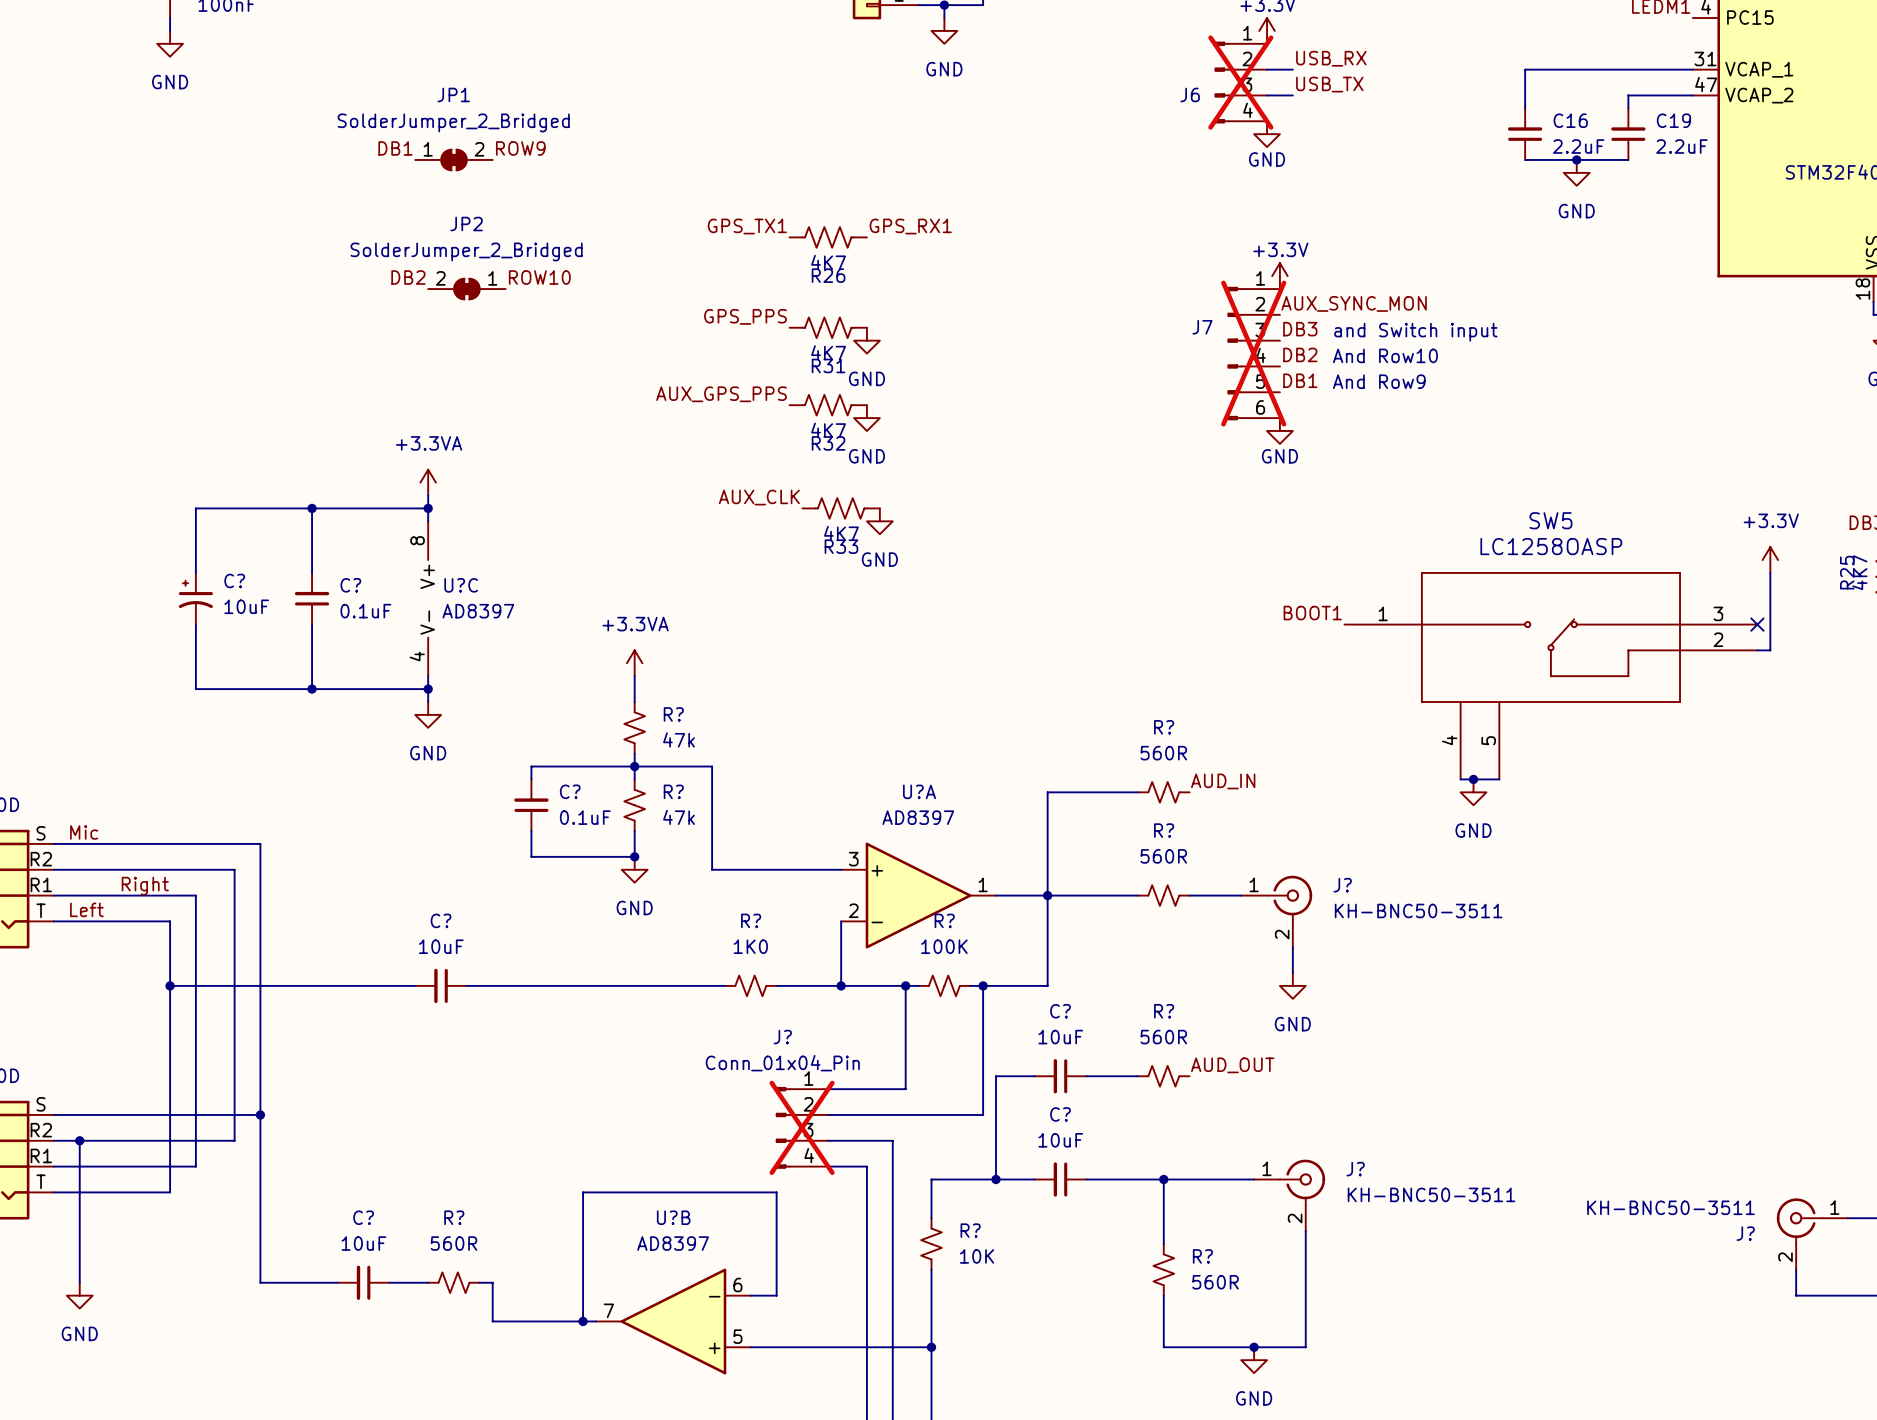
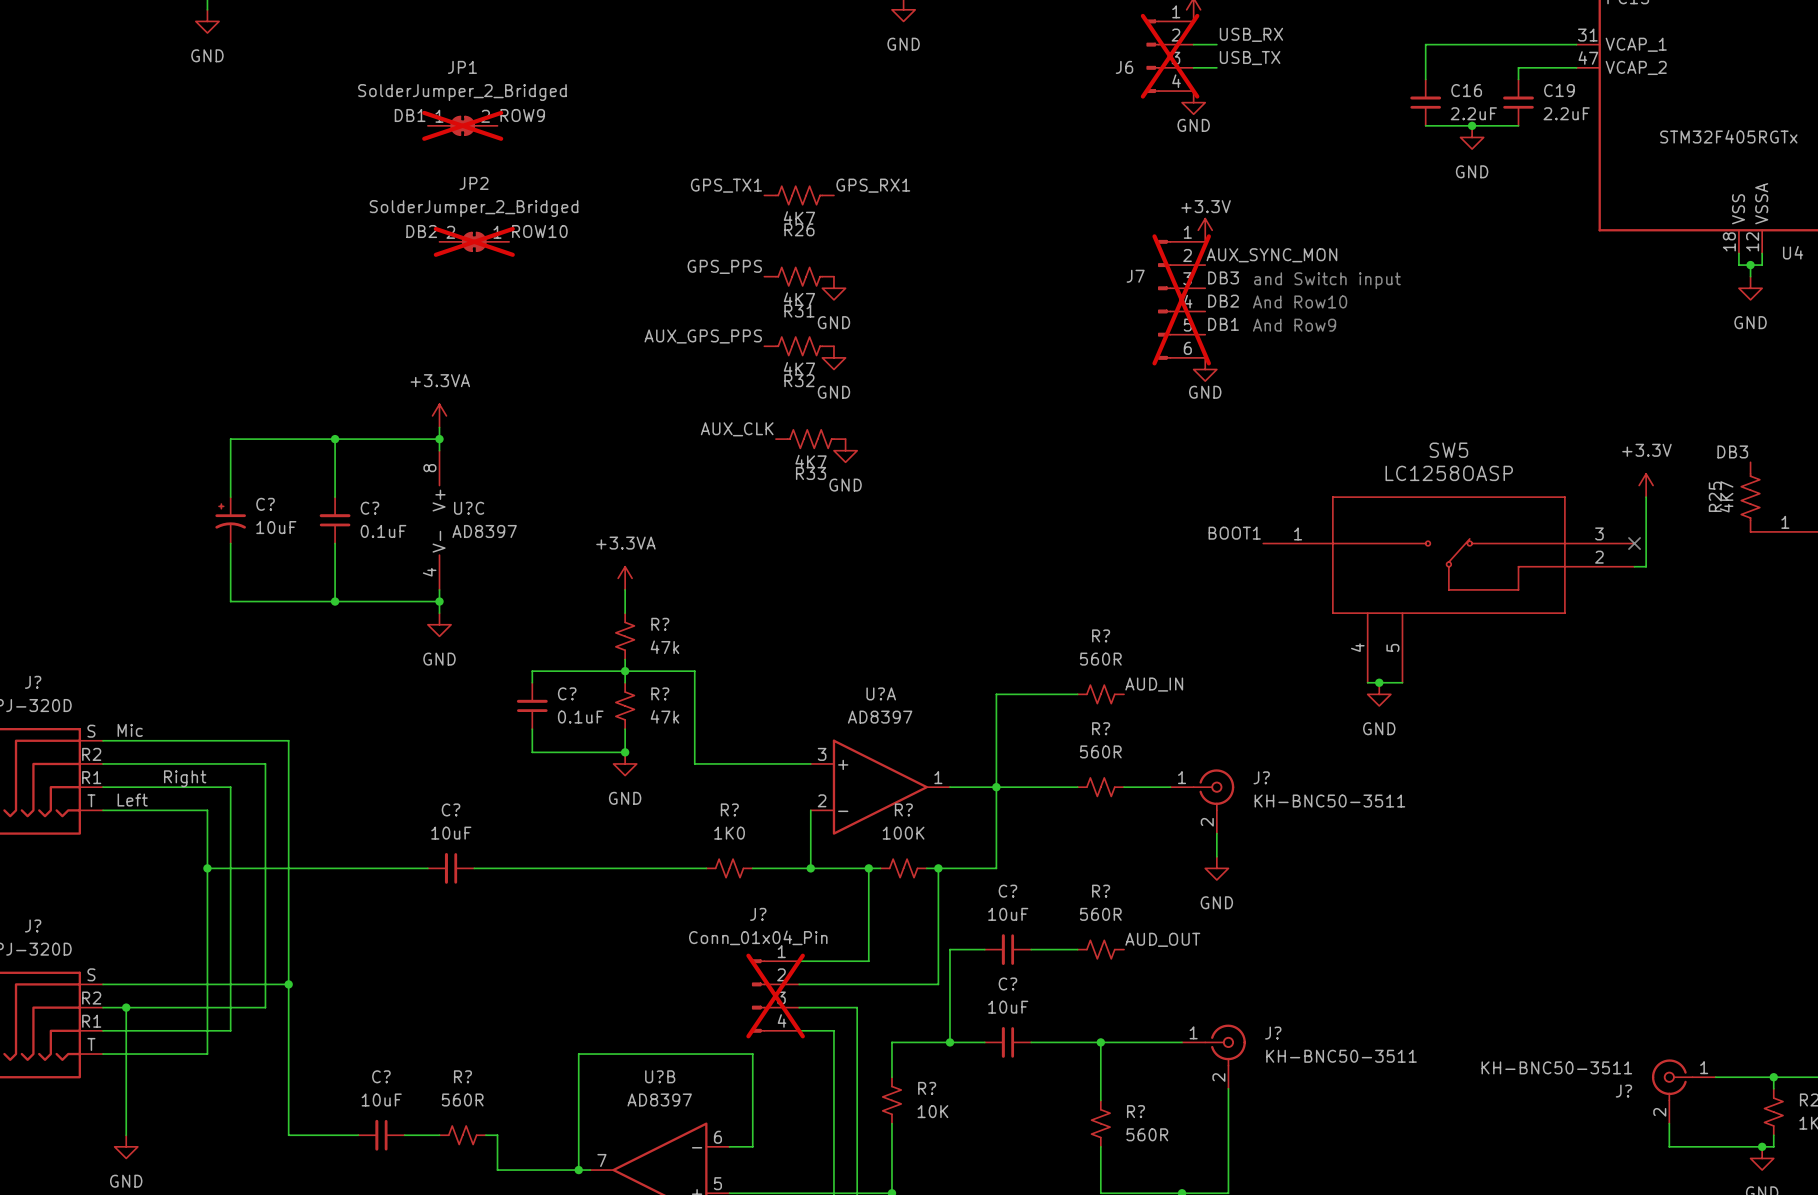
JP1 do-not-place cross: none -> (462, 125)
JP2 do-not-place cross: none -> (474, 241)

